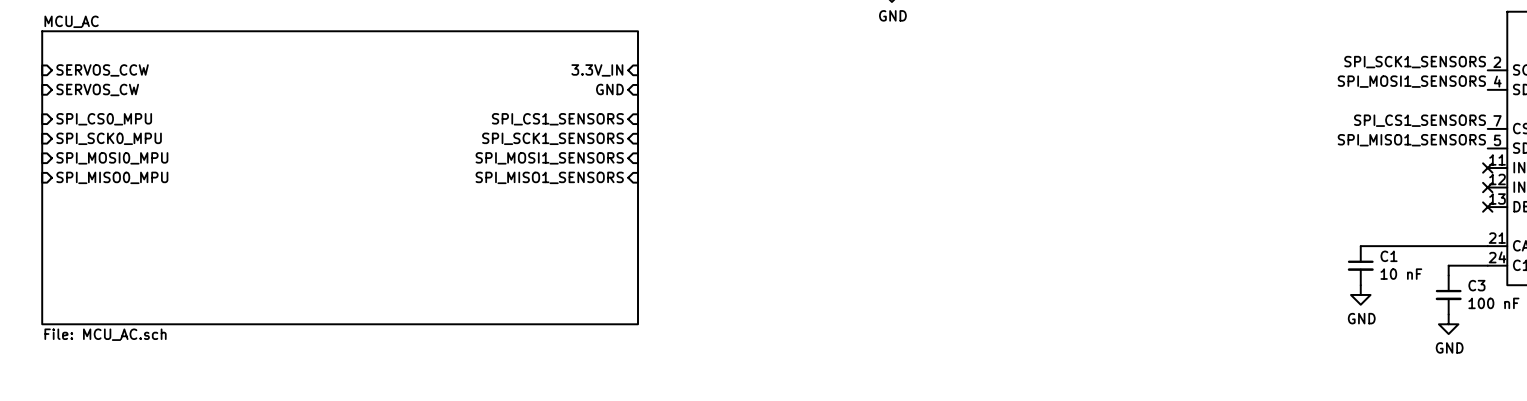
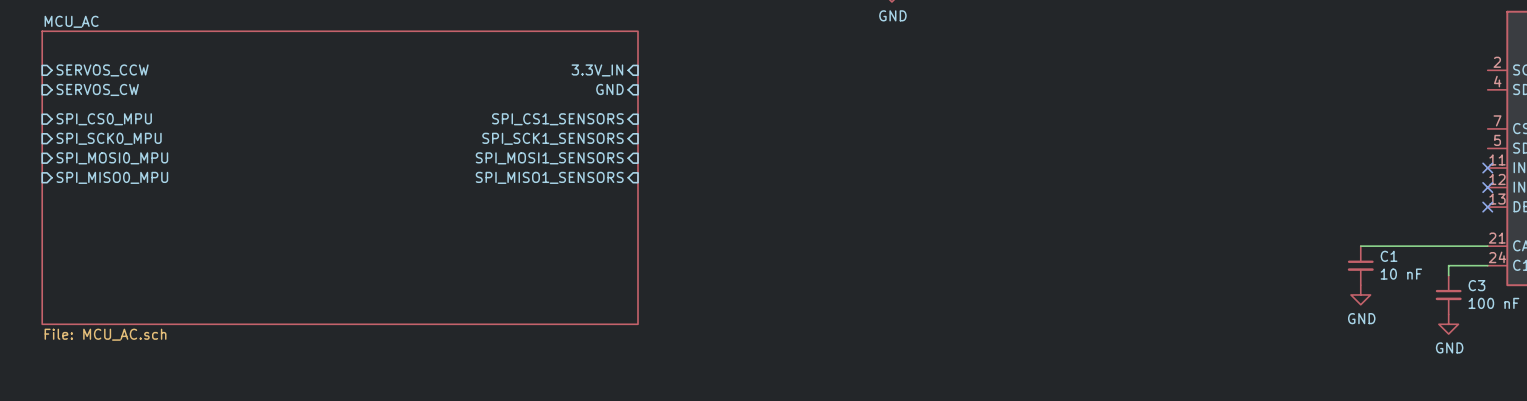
label: SPI_SCK1_SENSORS (1415, 62) -> none
label: SPI_MOSI1_SENSORS (1411, 81) -> none
label: SPI_CS1_SENSORS (1420, 120) -> none
label: SPI_MISO1_SENSORS (1411, 140) -> none

